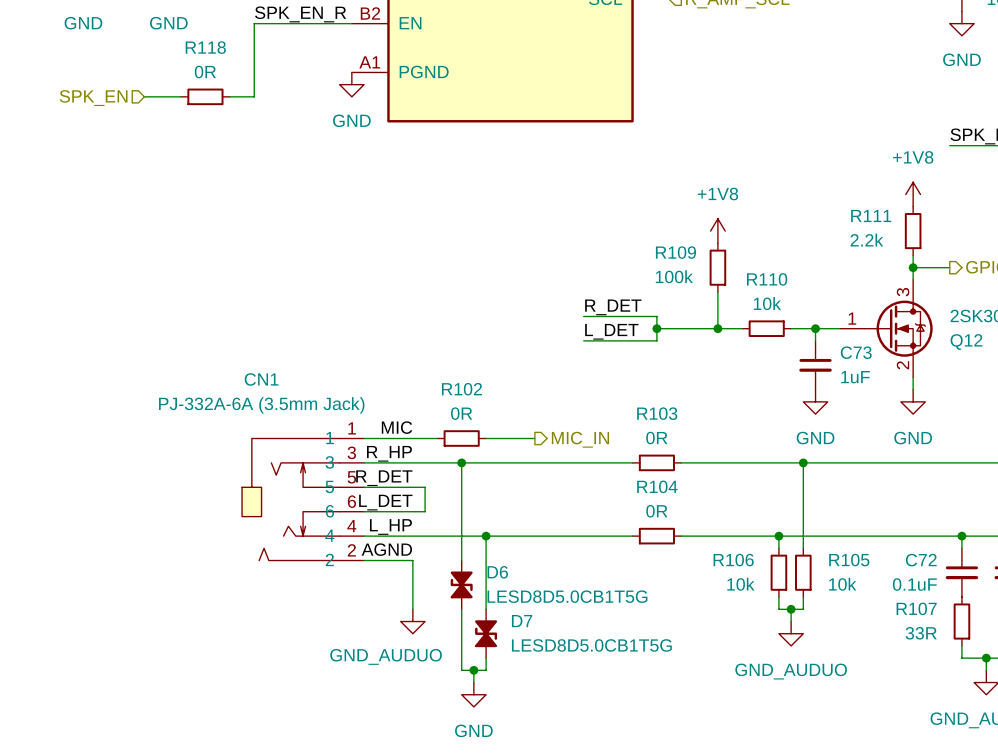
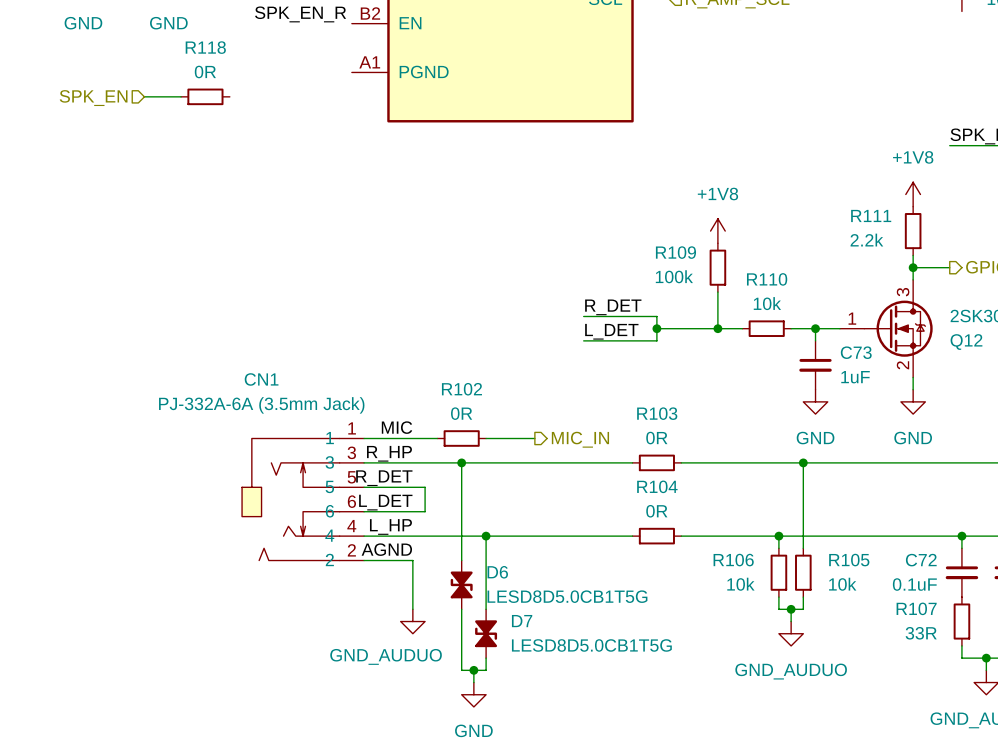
wire: (351, 23) (254, 23) (254, 96) (229, 96) -> none
power symbol: GND (961, 23) -> none
power symbol: GND (351, 84) -> none

